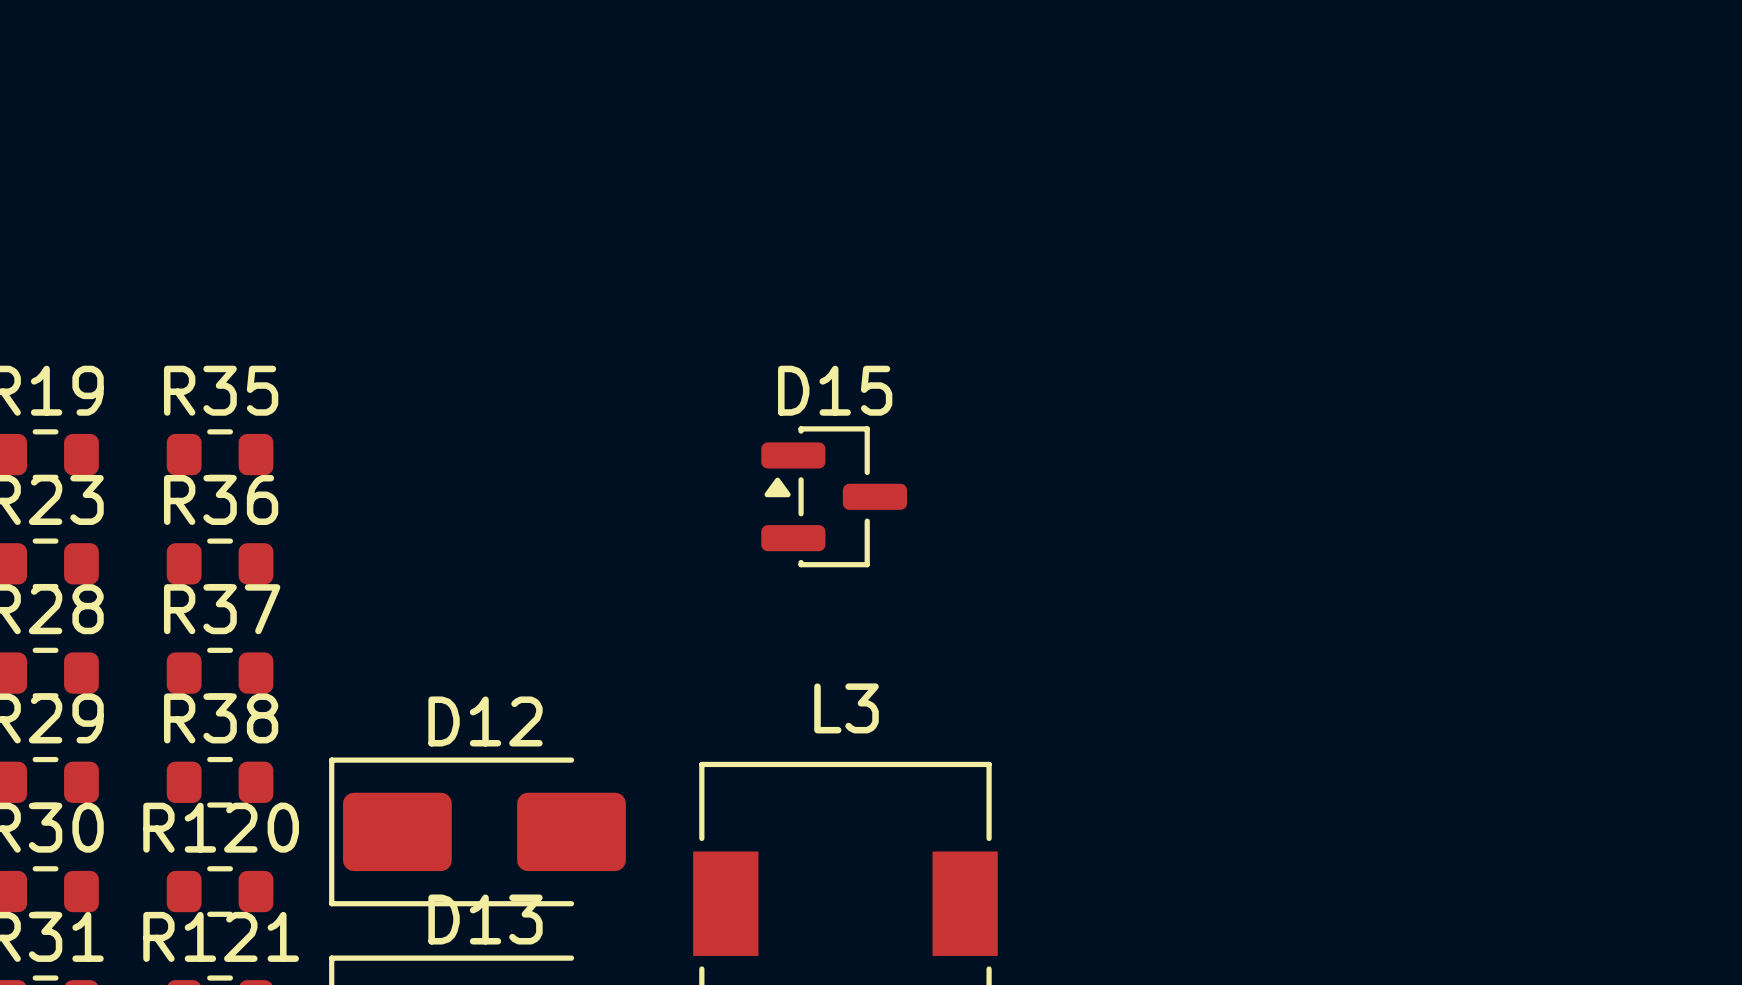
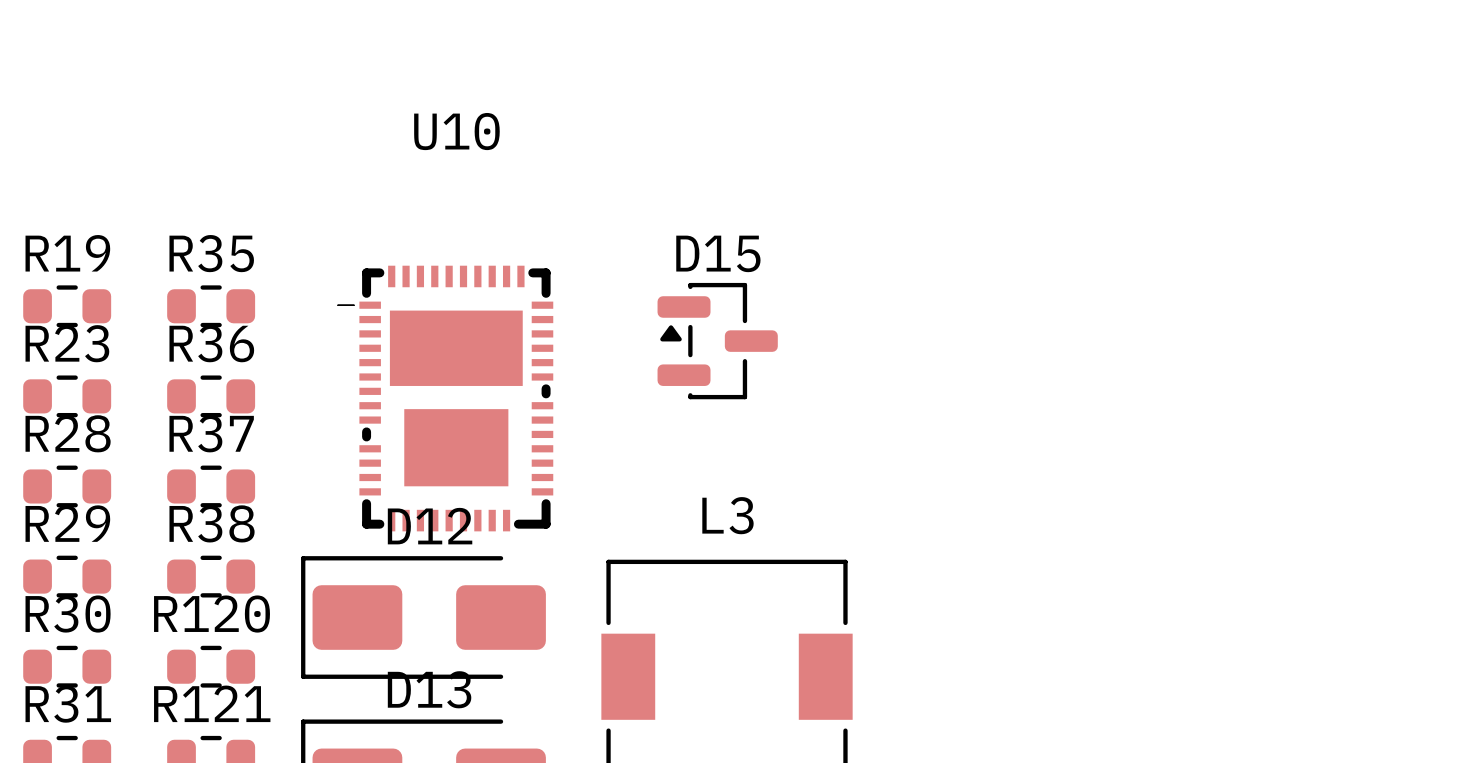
U10: none -> (445, 398)

